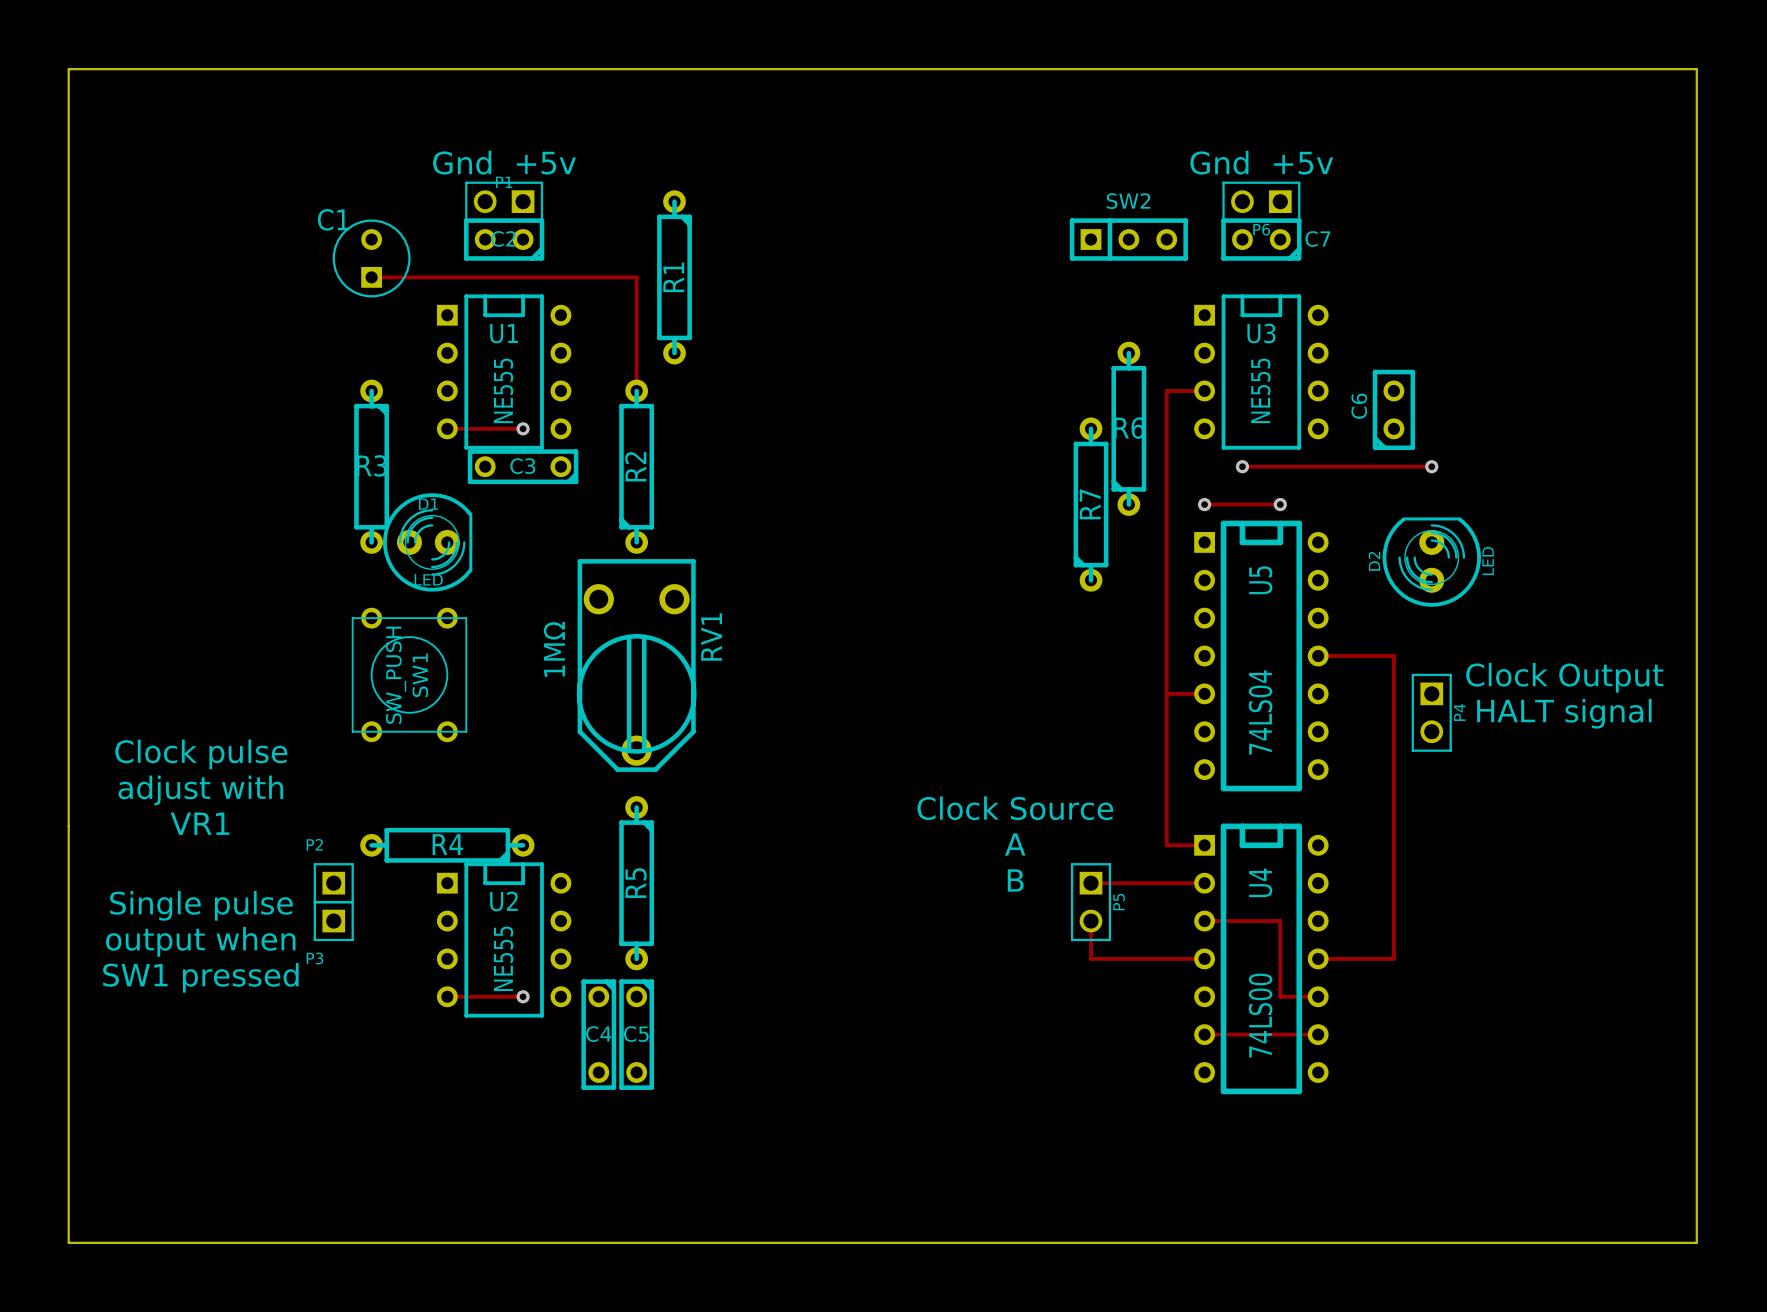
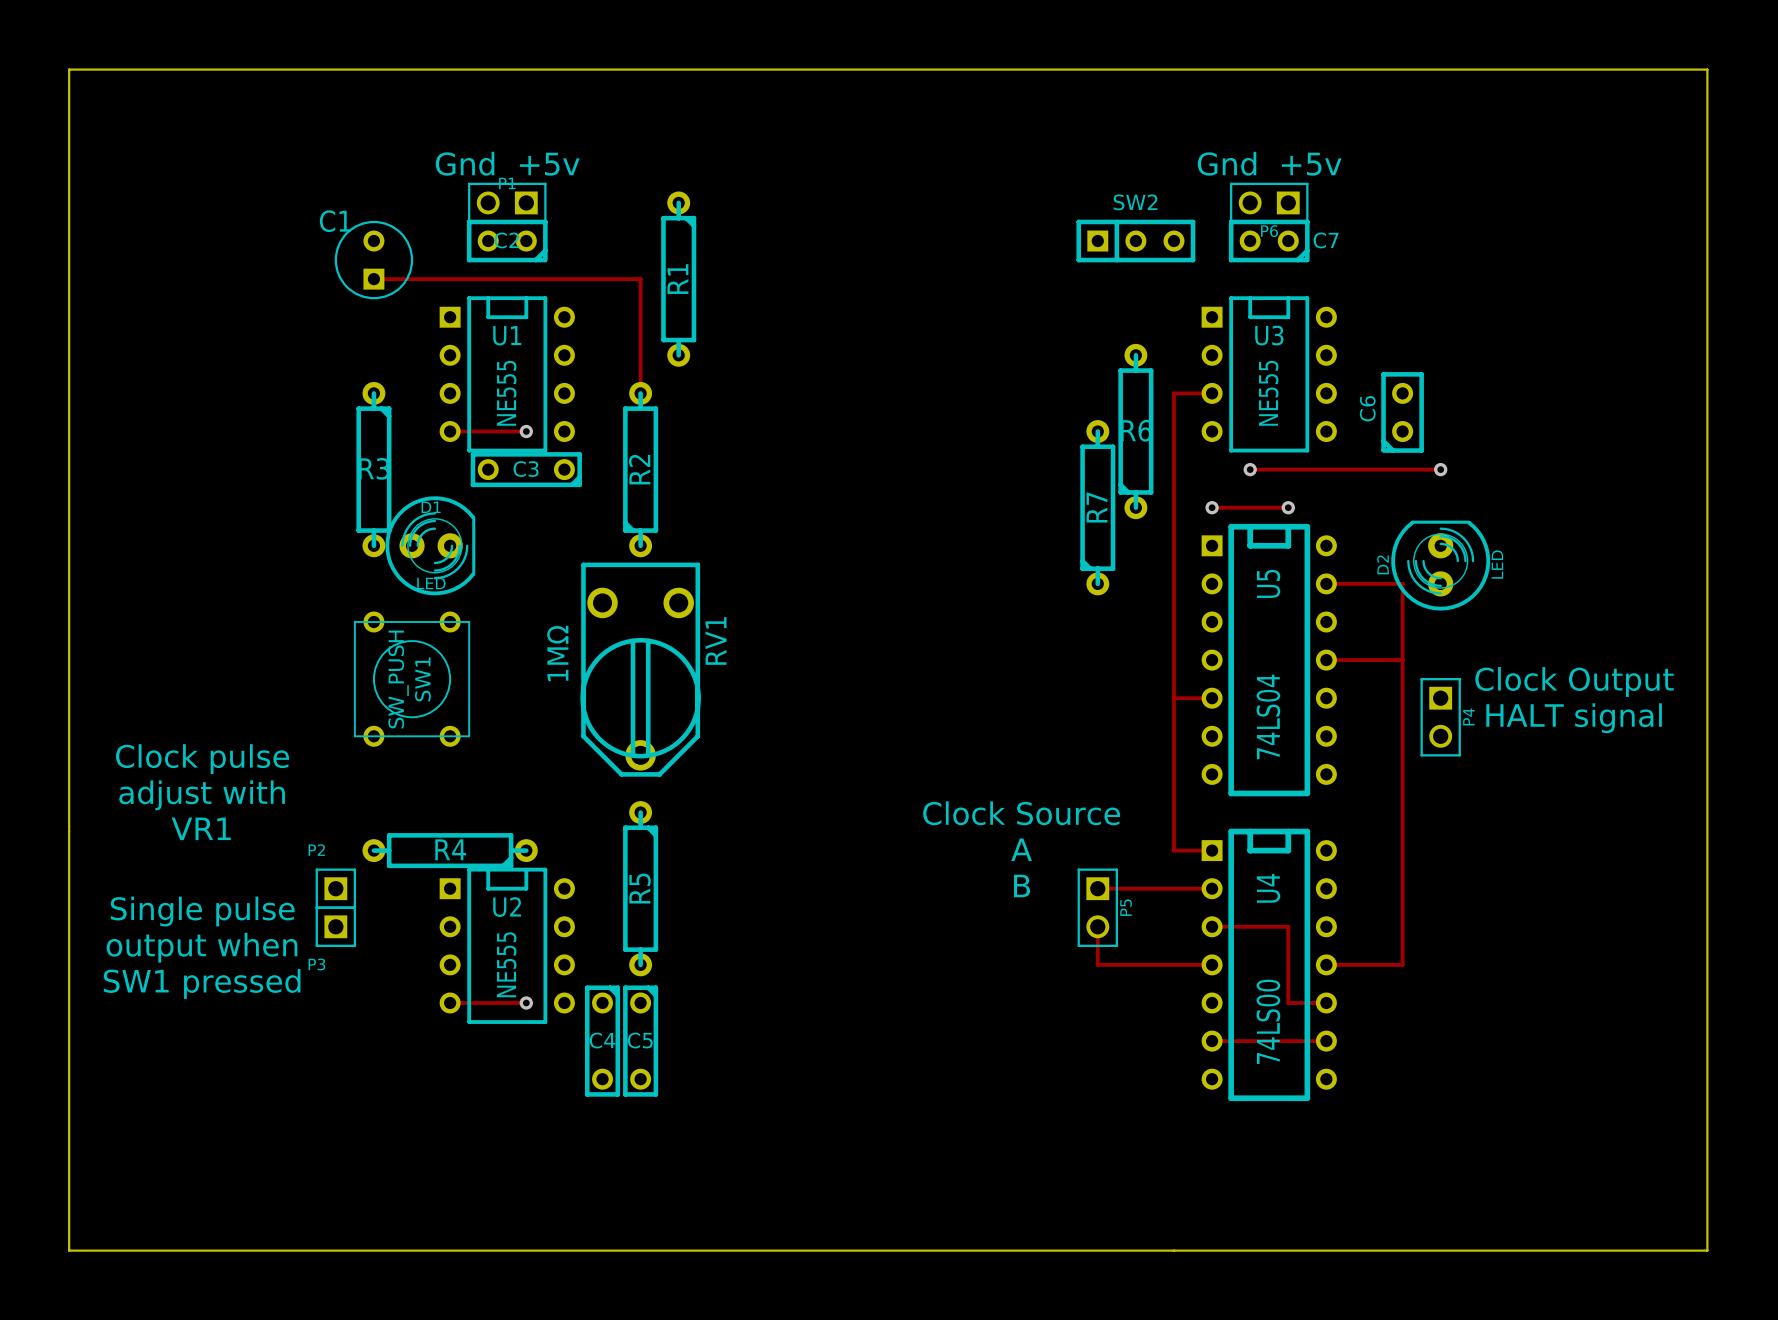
track: none -> (1326, 583) (1402, 583) (1402, 660)

